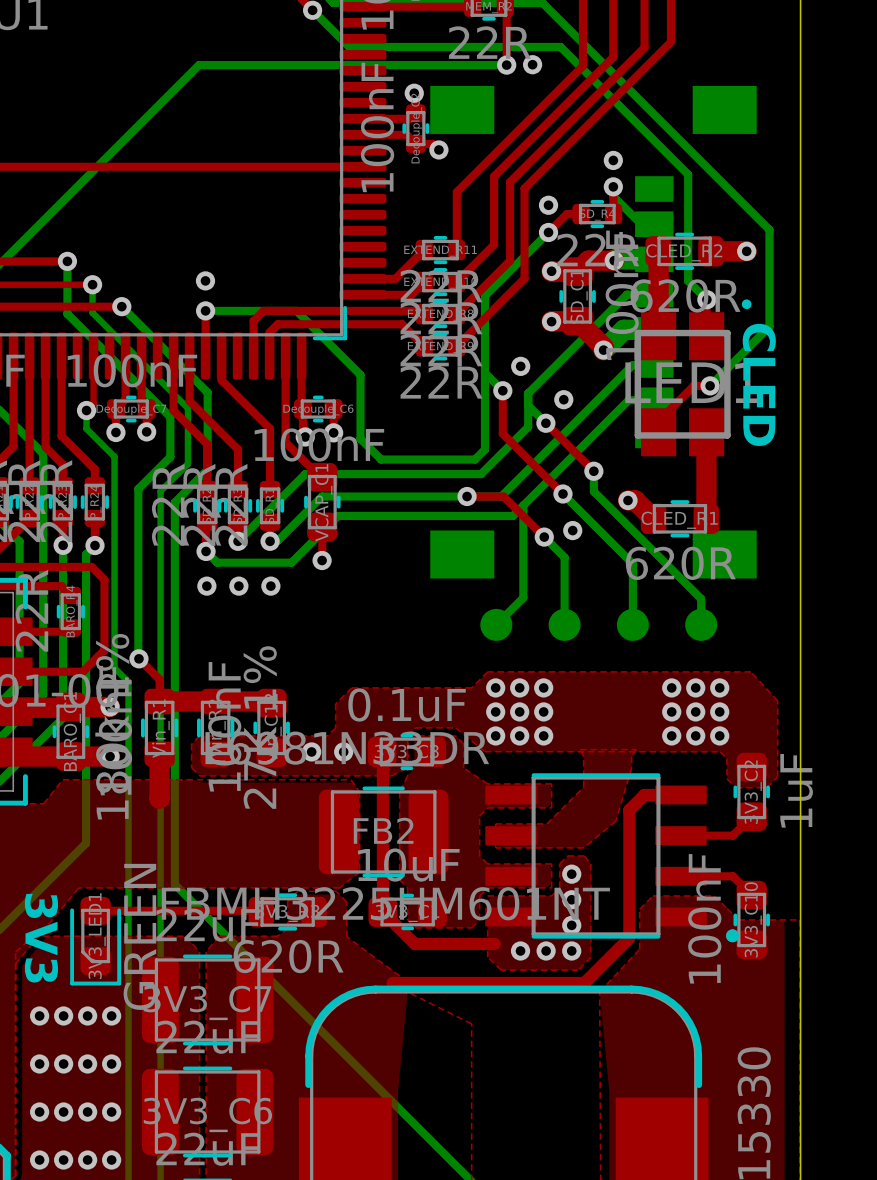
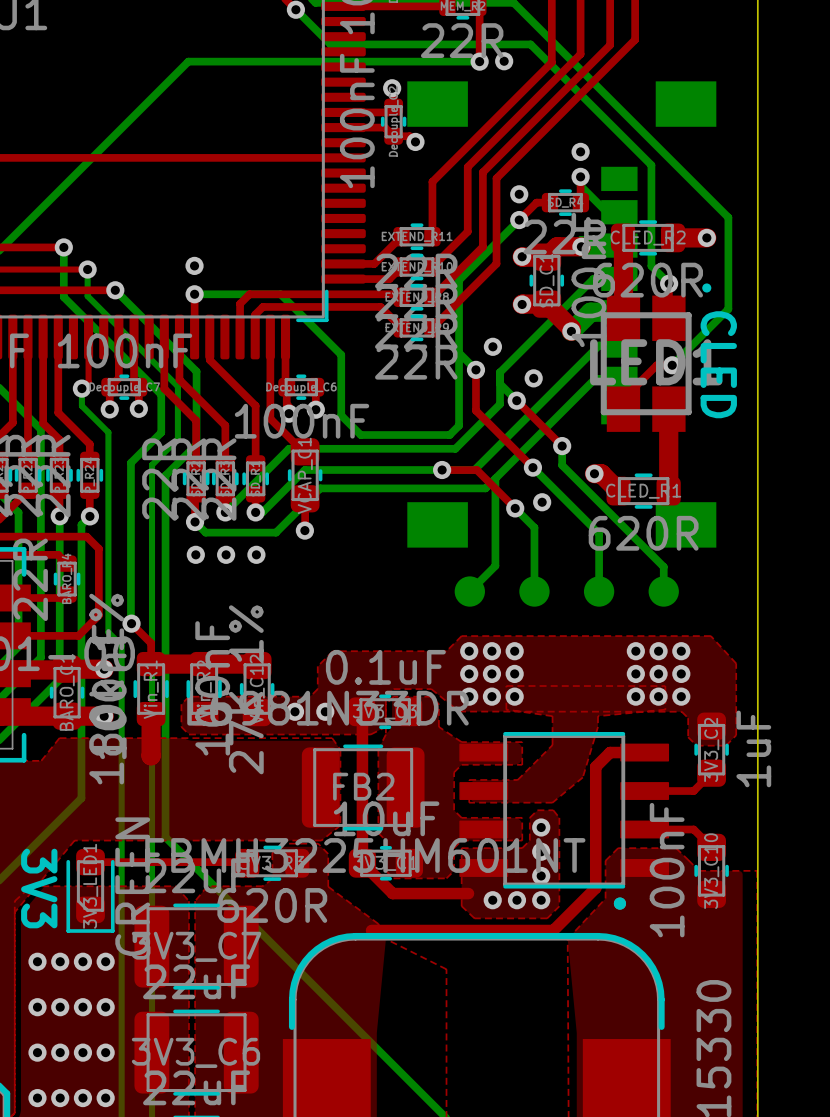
top zone outline: (583, 756) (580, 749) (636, 749) (631, 756) -> (552, 716) (506, 709) (506, 685) (665, 686) (665, 709) (597, 716)
part footprint: [485, 773, 739, 943] -> [459, 731, 670, 910]

